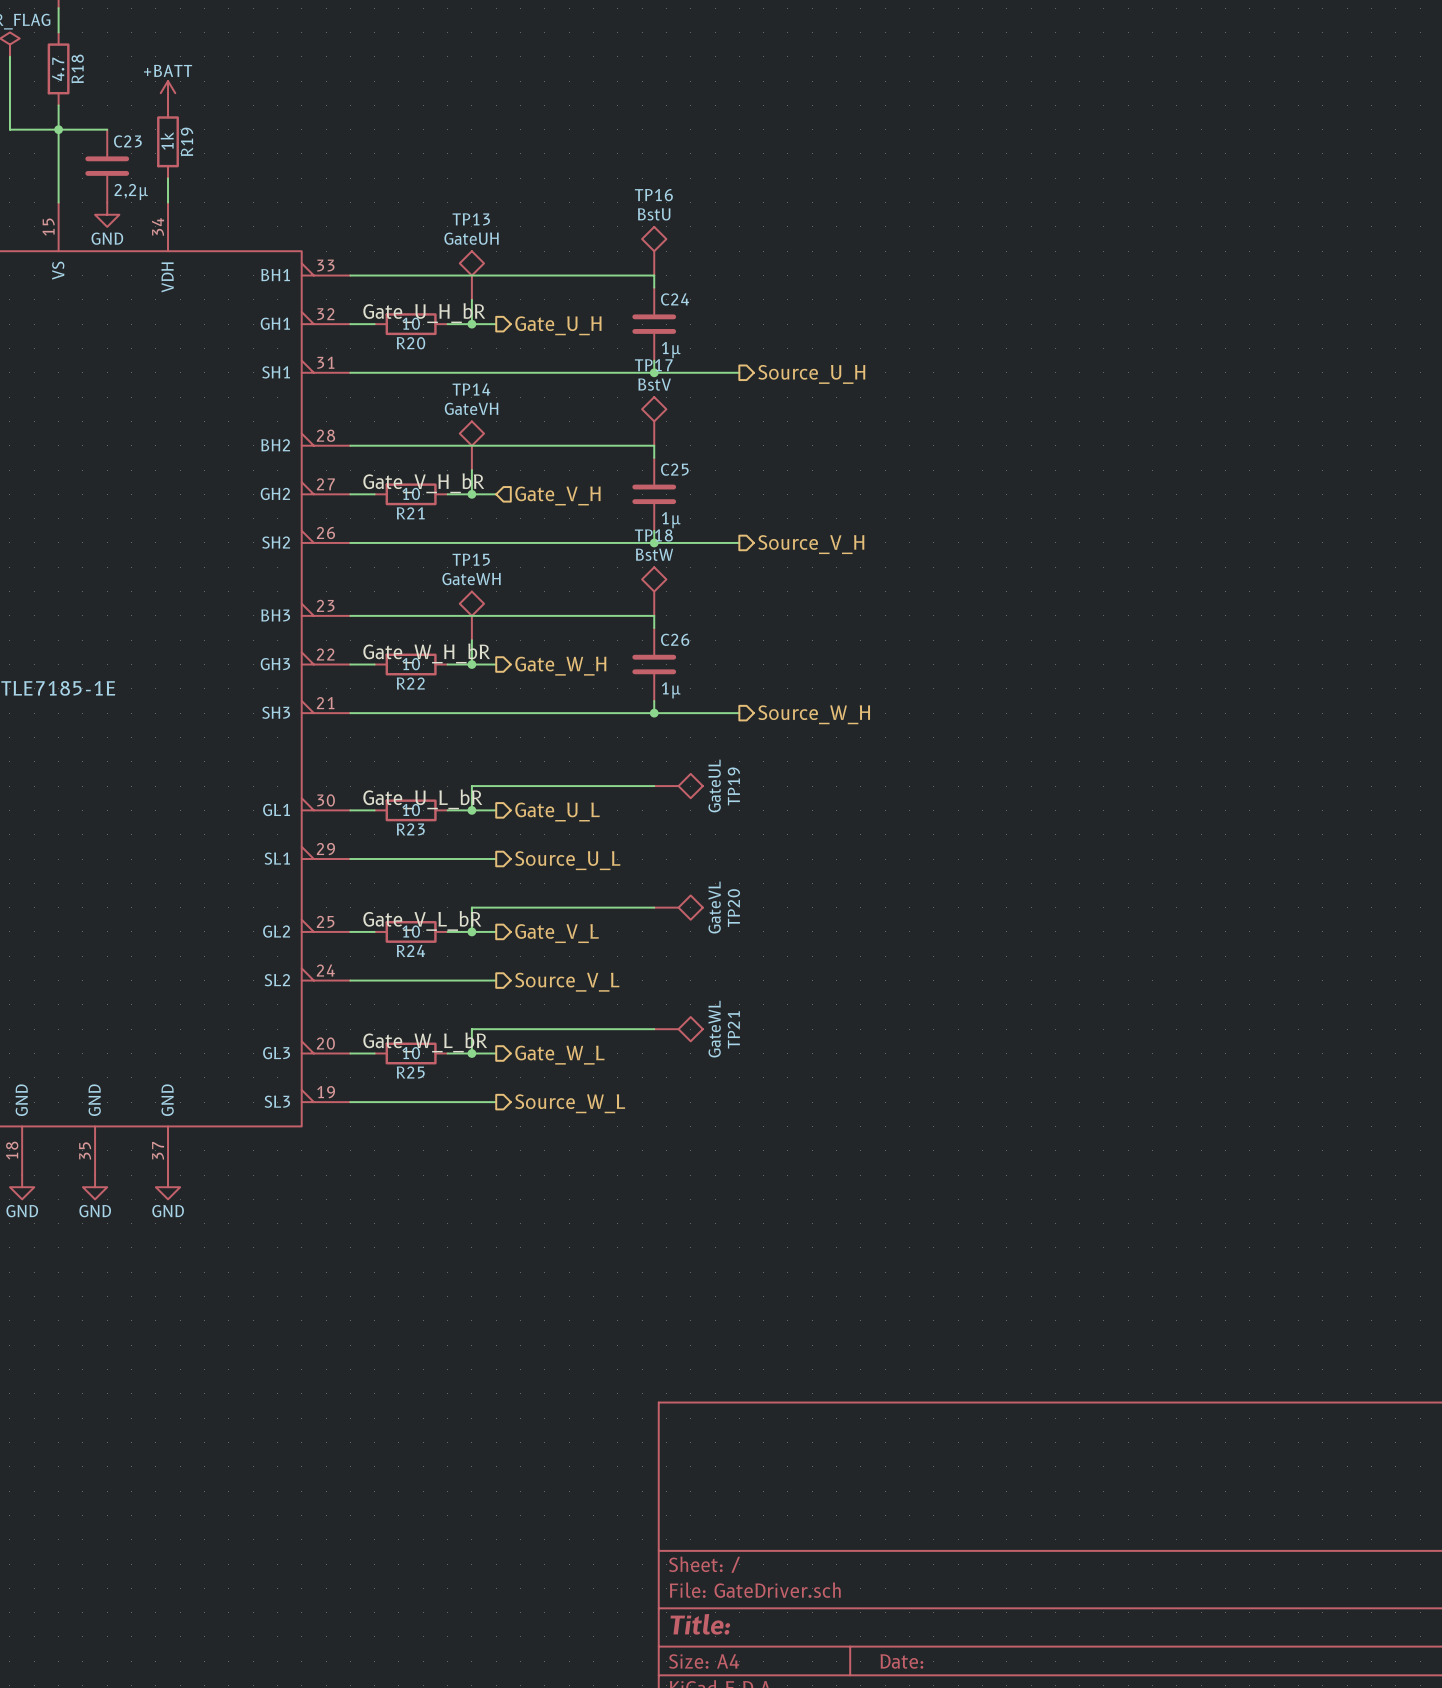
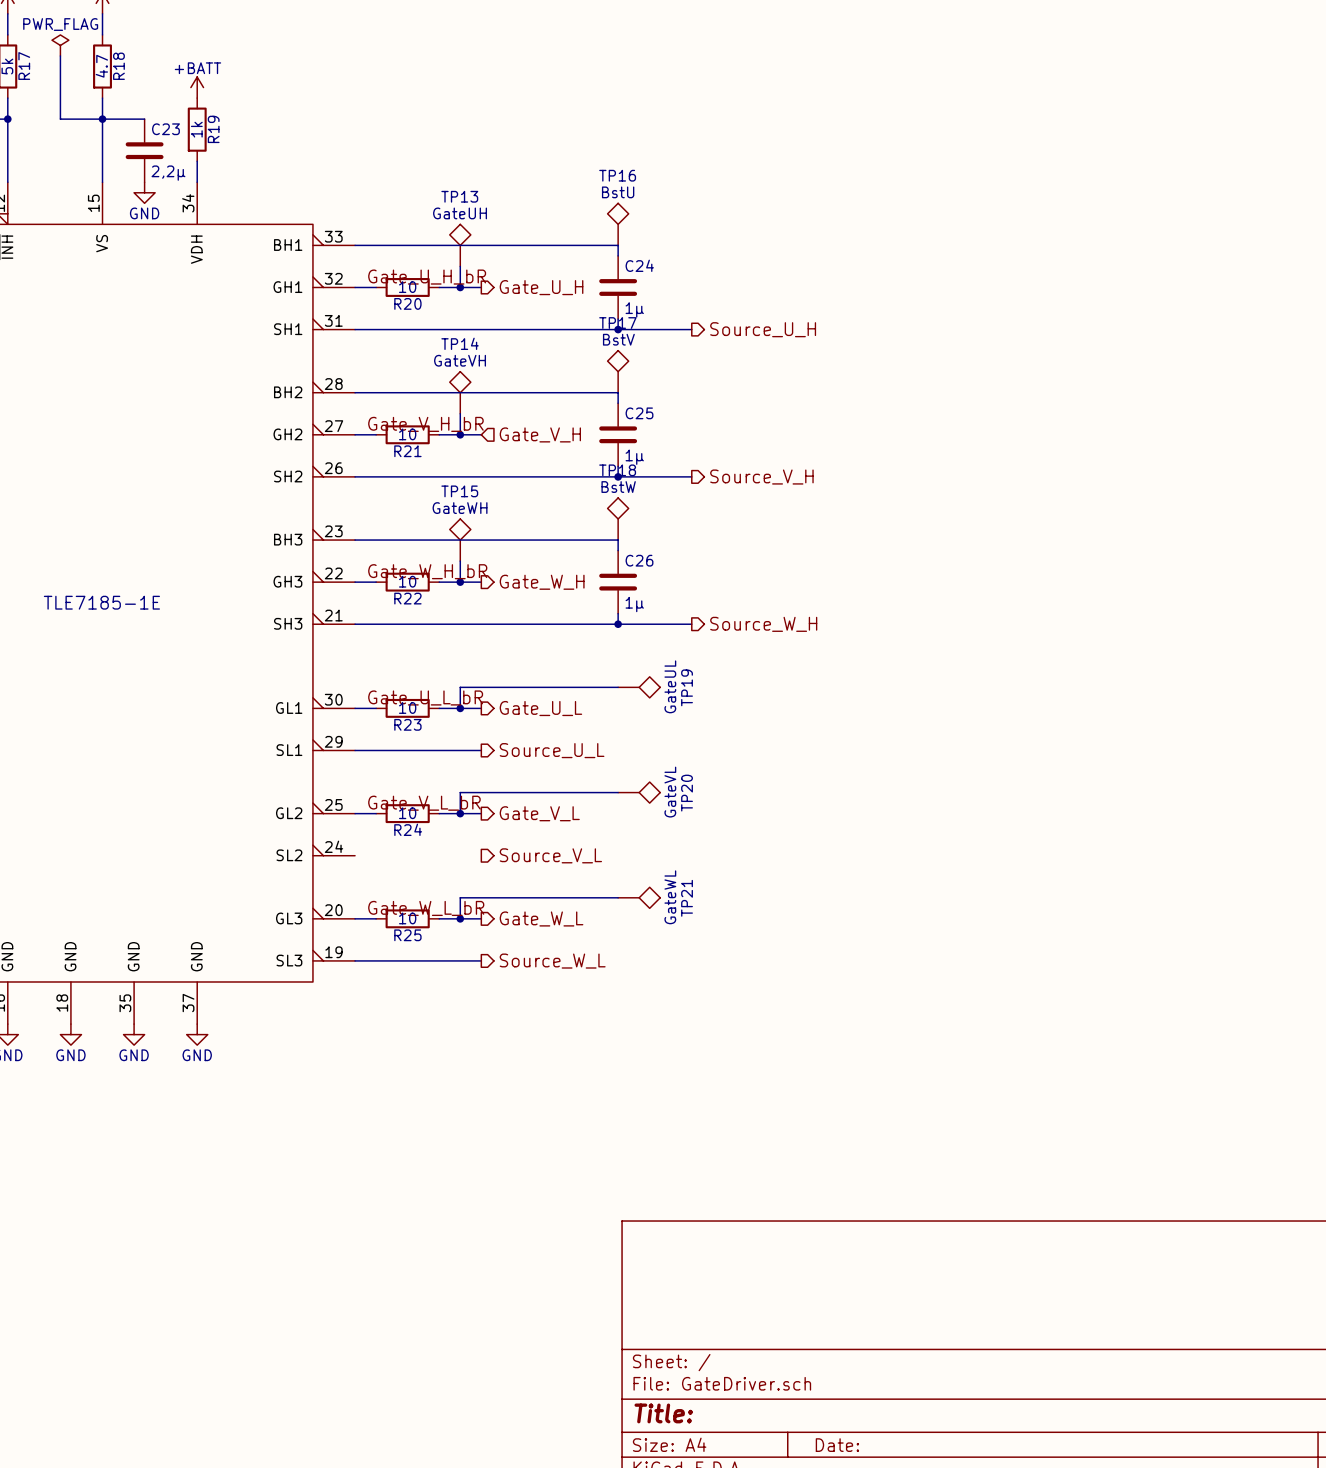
wire: (350, 980) (496, 980) -> none

